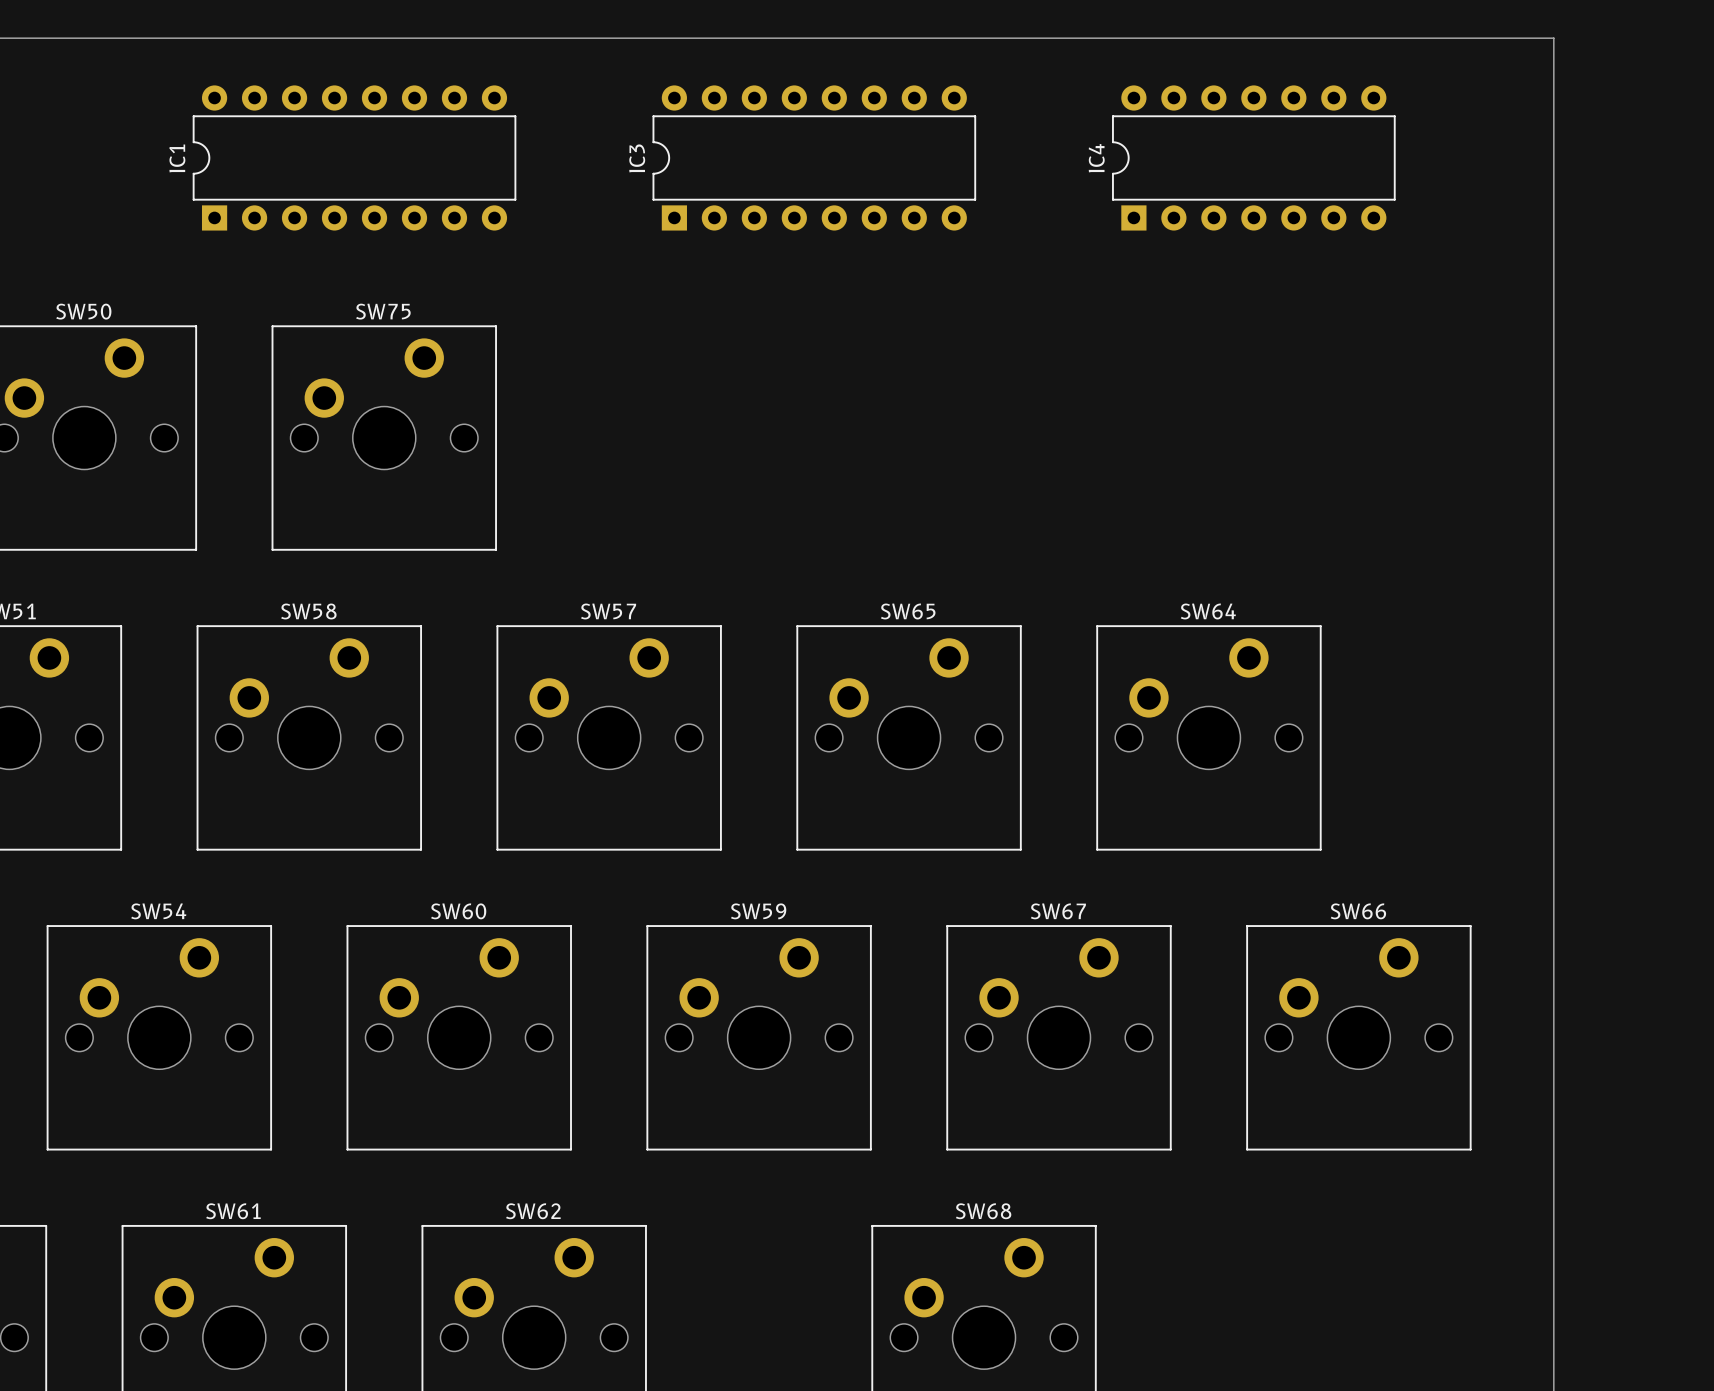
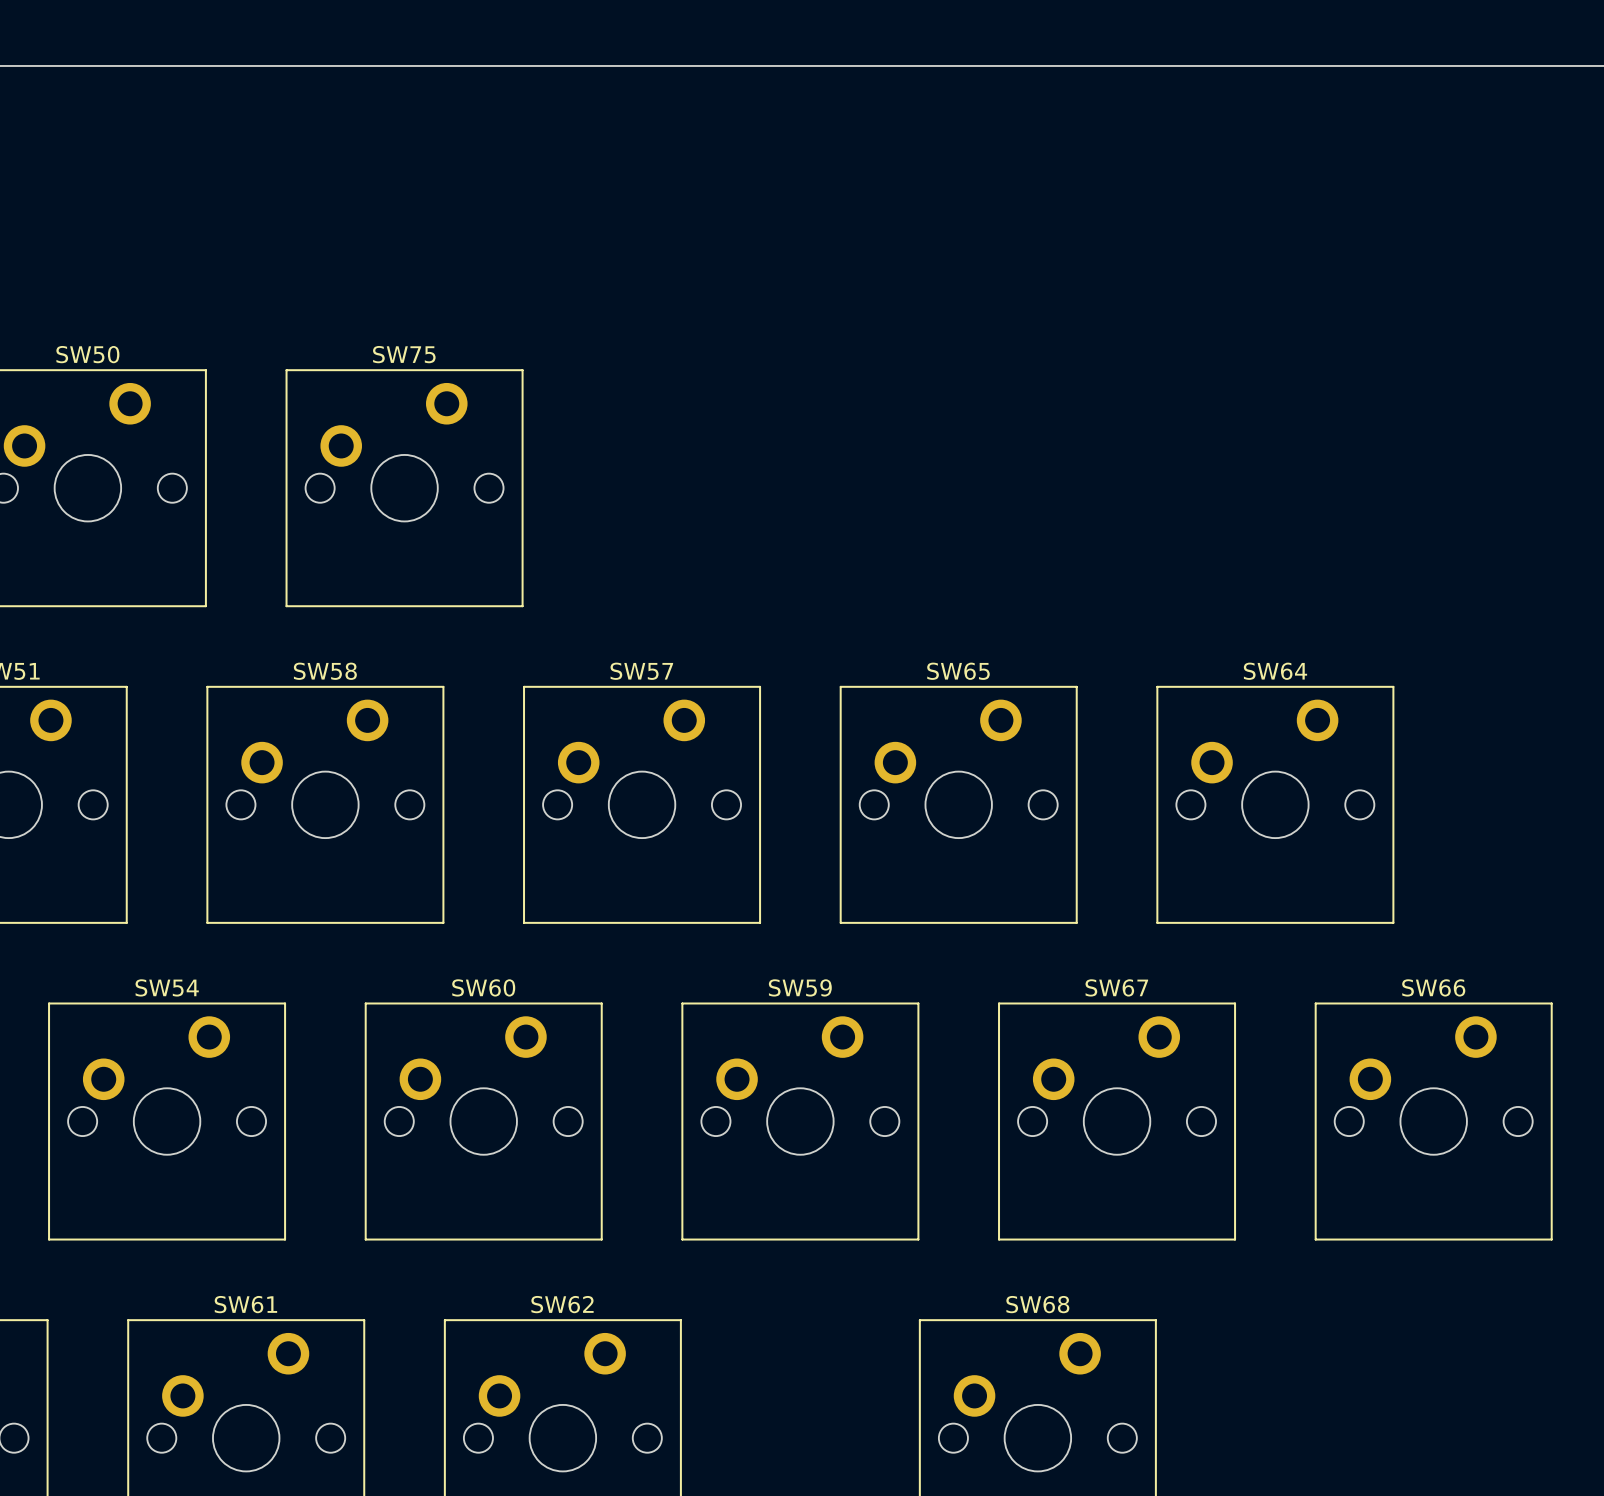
IC1: (354, 157) -> none
IC3: (814, 157) -> none
IC4: (1253, 157) -> none

